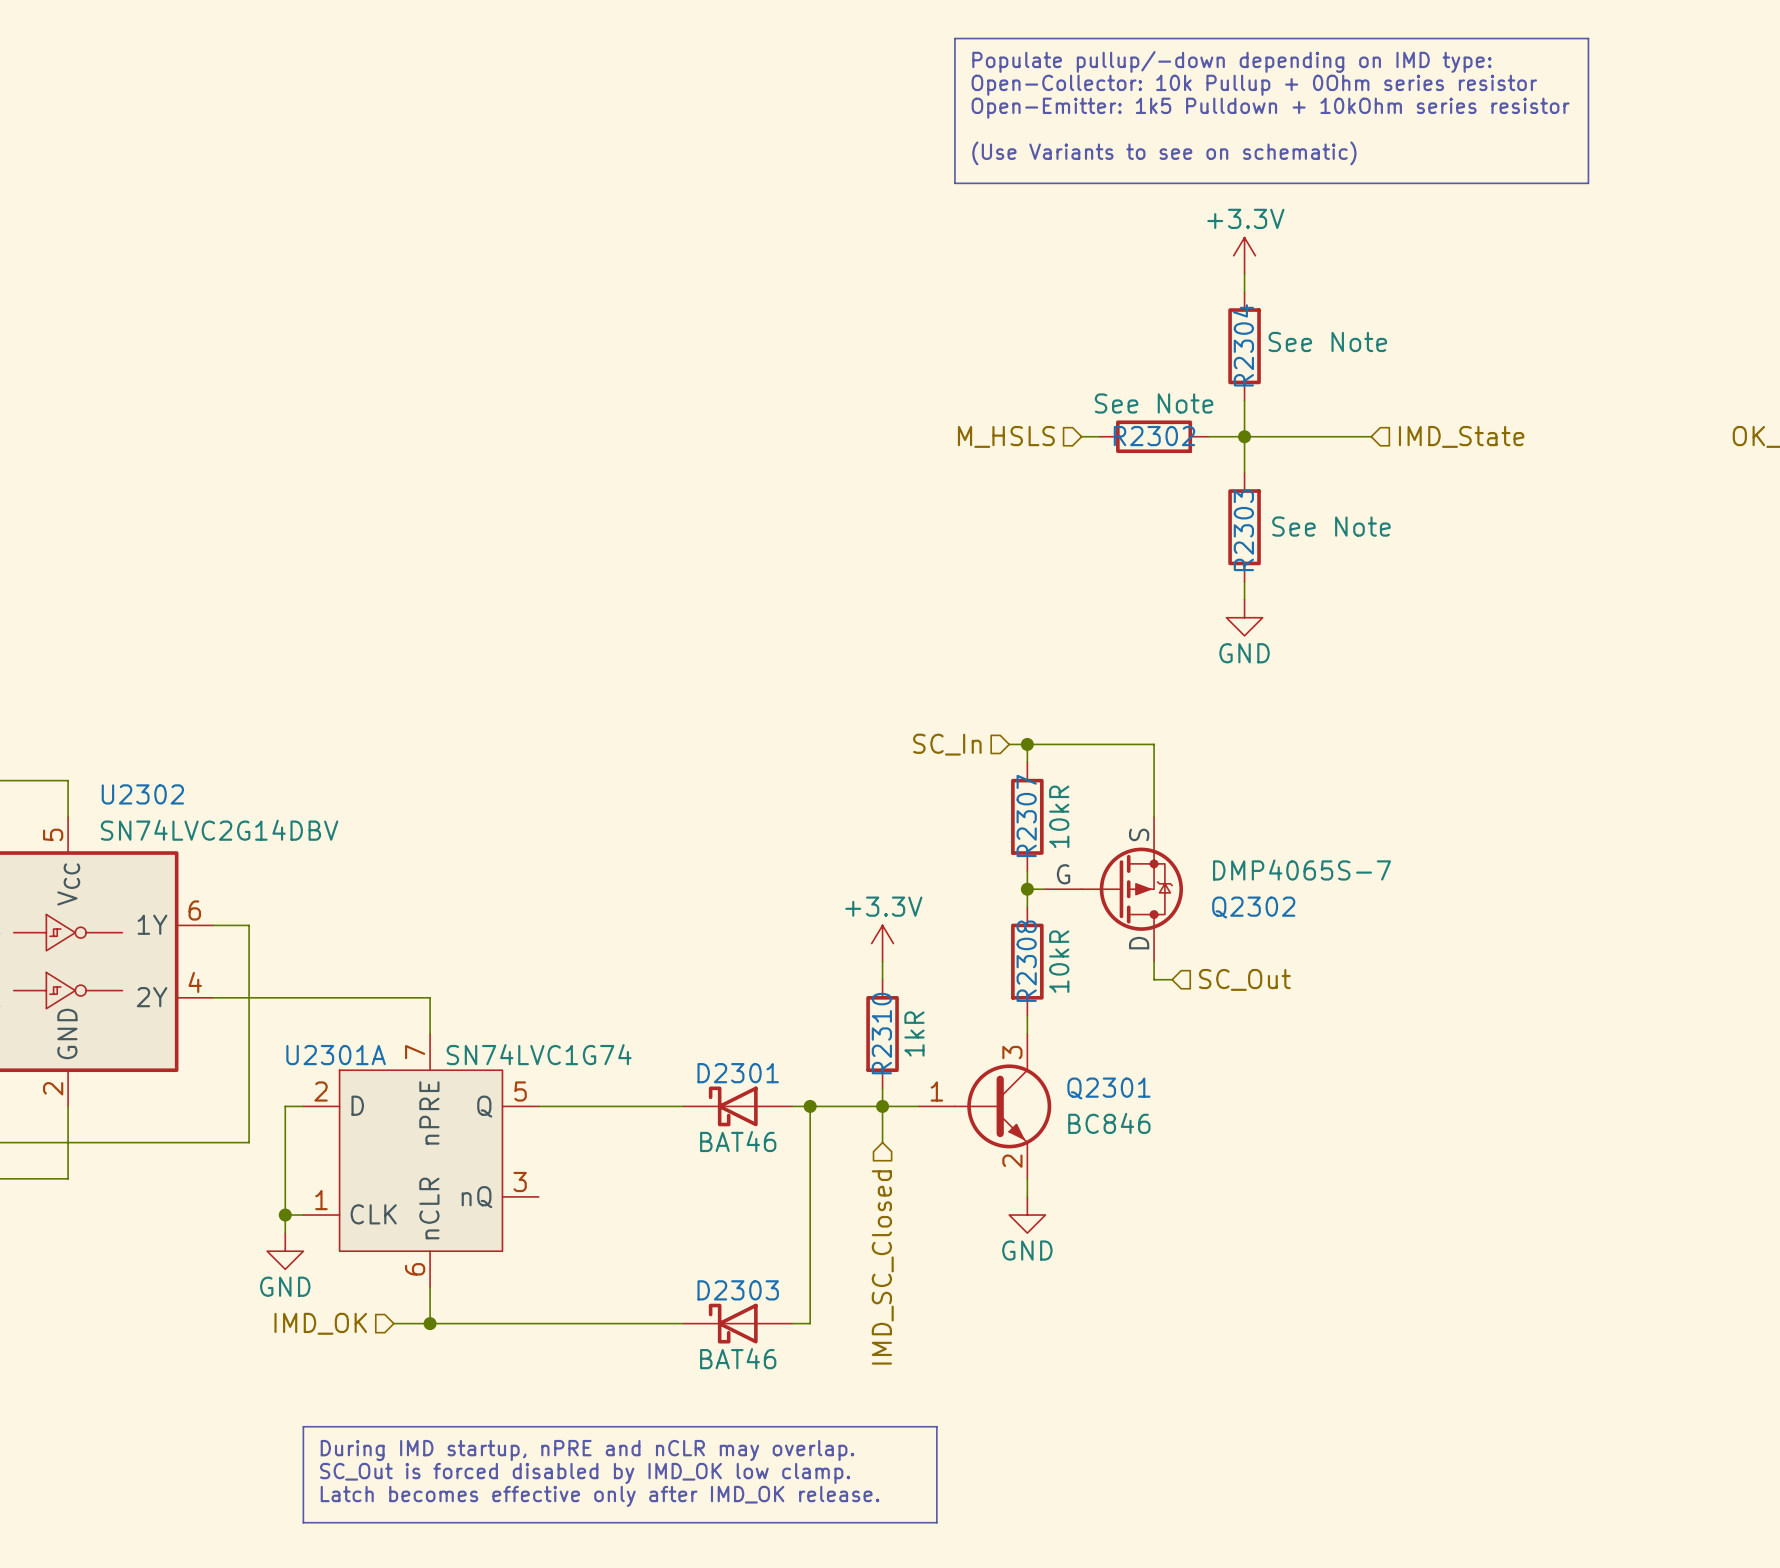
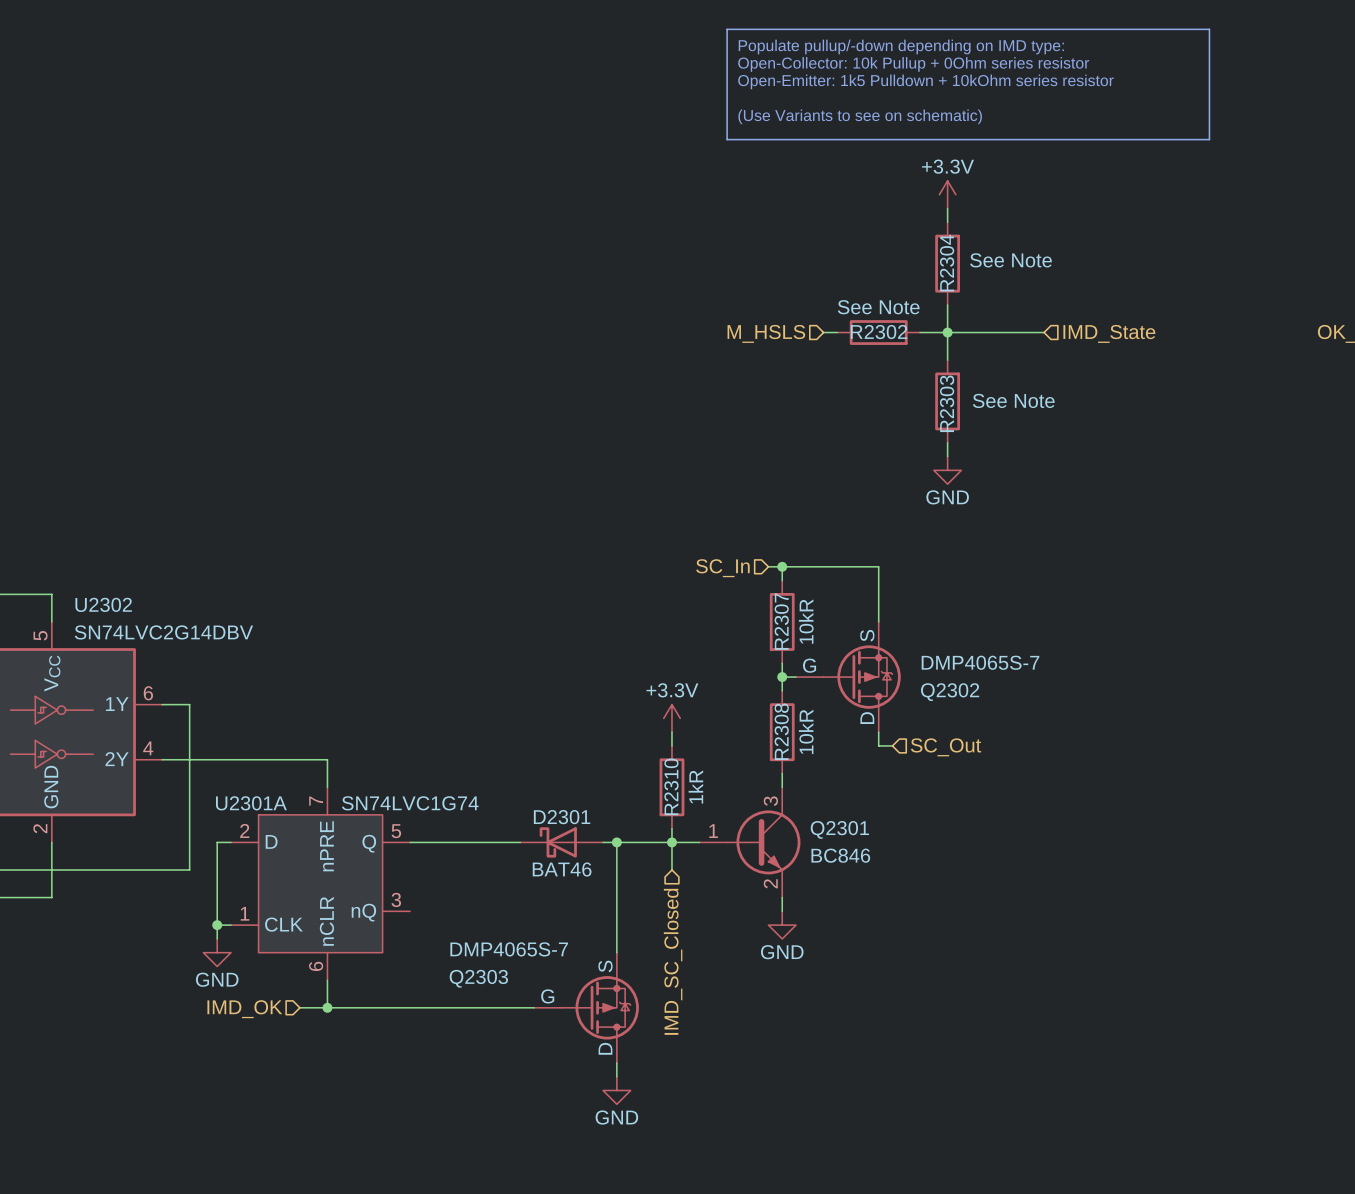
D2303: BAT46 (737, 1323) -> none
Q2303: none -> DMP4065S-7 (586, 1007)
wire: none -> (616, 1062) (616, 1076)
line: (303, 1426) (936, 1426) (936, 1522) (303, 1522) (303, 1426) -> none
power symbol: none -> GND (616, 1090)
text: During IMD startup, nPRE and nCLR may overlap. (587, 1450) -> none
text: SC_Out is forced disabled by IMD_OK low clamp. (585, 1473) -> none
text: Latch becomes effective only after IMD_OK release. (600, 1496) -> none

